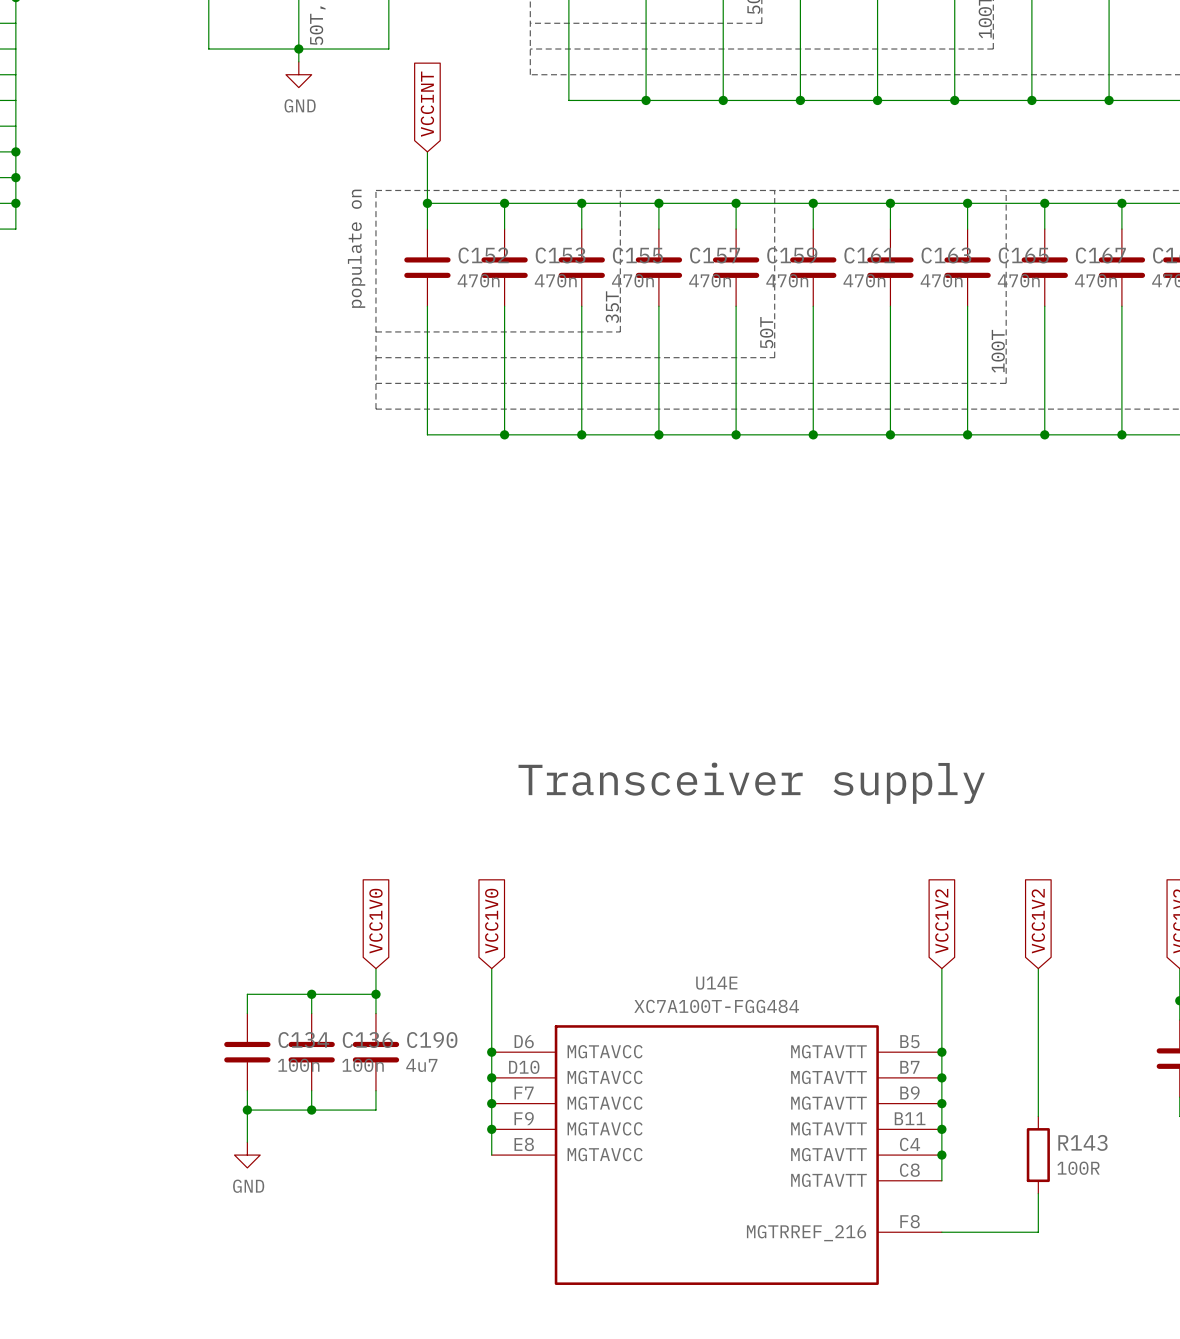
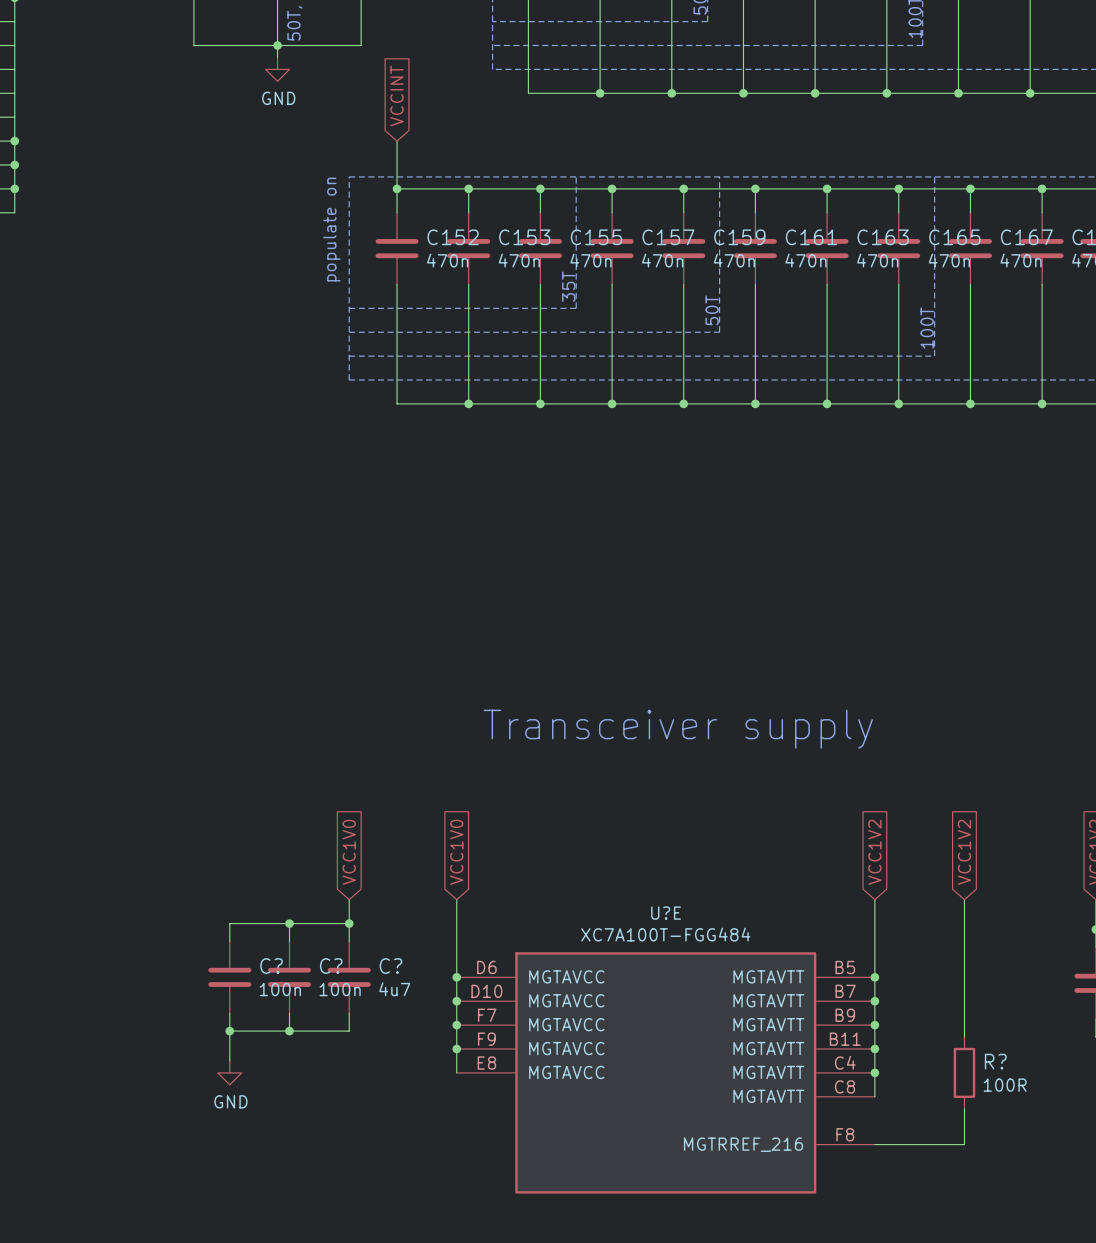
U14E name: U14E (716, 983) -> U?E (666, 913)
C134 name: C134 (303, 1040) -> C? (271, 966)
C136 name: C136 (367, 1040) -> C? (331, 966)
C190 name: C190 (432, 1040) -> C? (390, 966)
R143 name: R143 (1082, 1142) -> R? (995, 1061)

